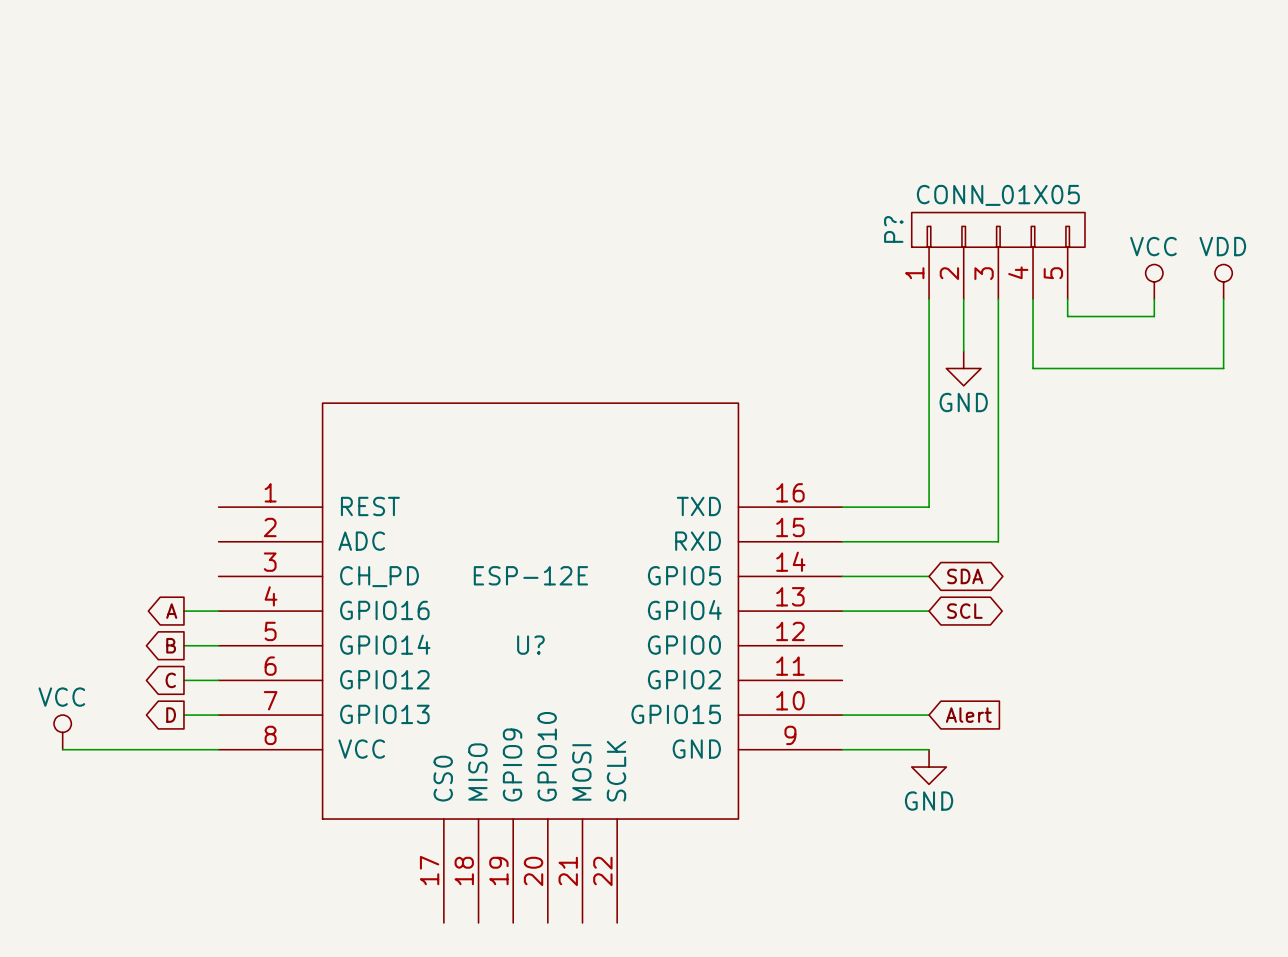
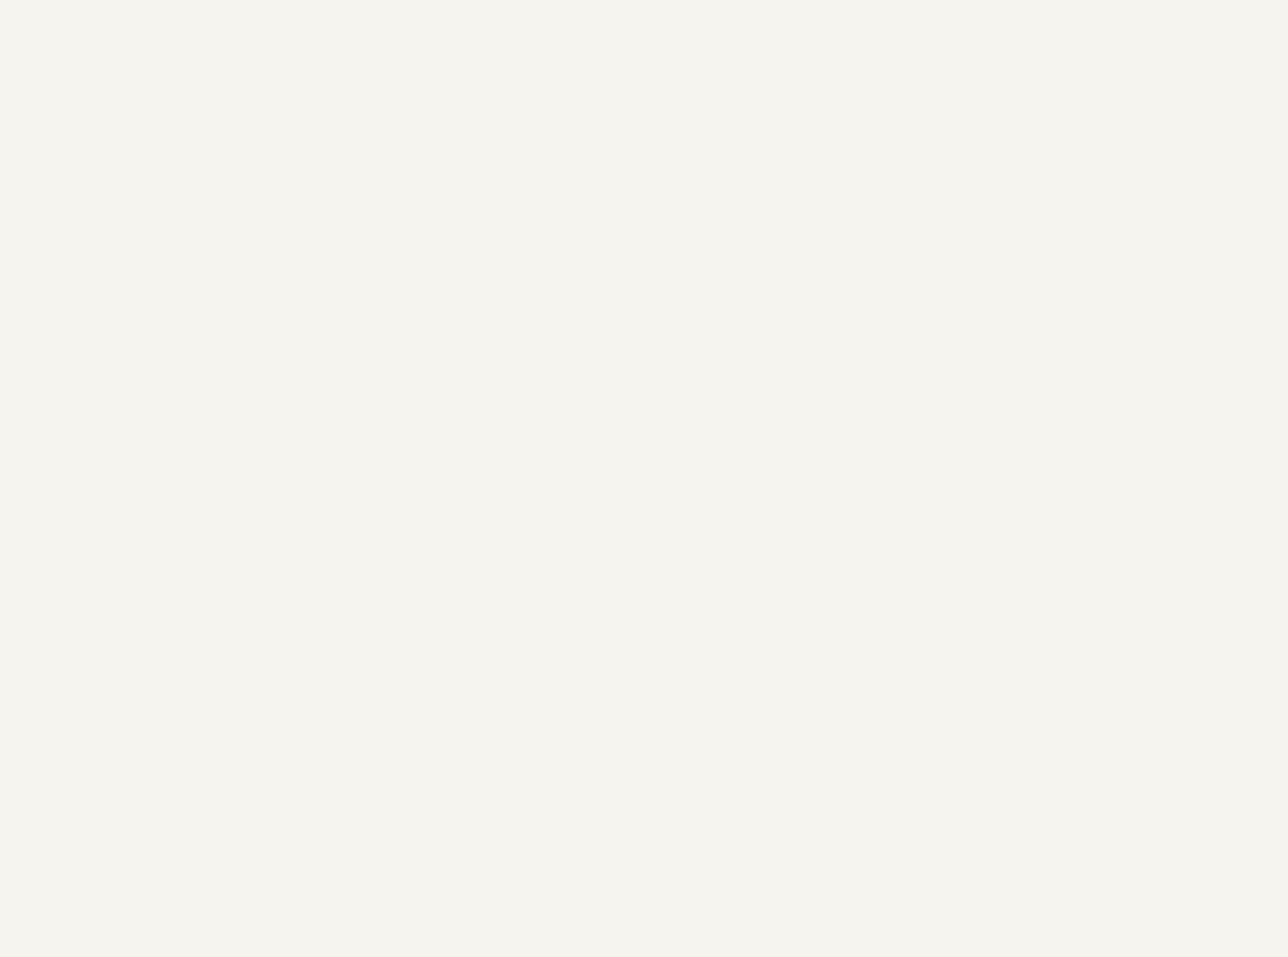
P?: CONN_01X05 (998, 255) -> none
power symbol: VCC (1154, 281) -> none
power symbol: VDD (1223, 281) -> none
wire: (929, 299) (929, 507) (842, 507) -> none
wire: (963, 299) (963, 351) -> none
wire: (998, 299) (998, 541) (842, 541) -> none
wire: (1033, 299) (1033, 368) (1223, 368) (1223, 299) -> none
wire: (1067, 299) (1067, 316) (1154, 316) (1154, 299) -> none
power symbol: GND (963, 368) -> none
wire: (842, 576) (929, 576) -> none
global label: SDA (965, 576) -> none
global label: A (171, 611) -> none
wire: (183, 611) (218, 611) -> none
wire: (842, 611) (929, 611) -> none
global label: SCL (964, 611) -> none
global label: B (171, 645) -> none
wire: (183, 645) (218, 645) -> none
U?: ESP-12E (530, 663) -> none
global label: C (170, 680) -> none
wire: (183, 680) (218, 680) -> none
global label: D (171, 715) -> none
wire: (183, 715) (218, 715) -> none
wire: (842, 715) (929, 715) -> none
global label: Alert (968, 715) -> none
power symbol: VCC (62, 732) -> none
wire: (62, 749) (218, 749) -> none
wire: (842, 749) (929, 749) -> none
power symbol: GND (929, 767) -> none

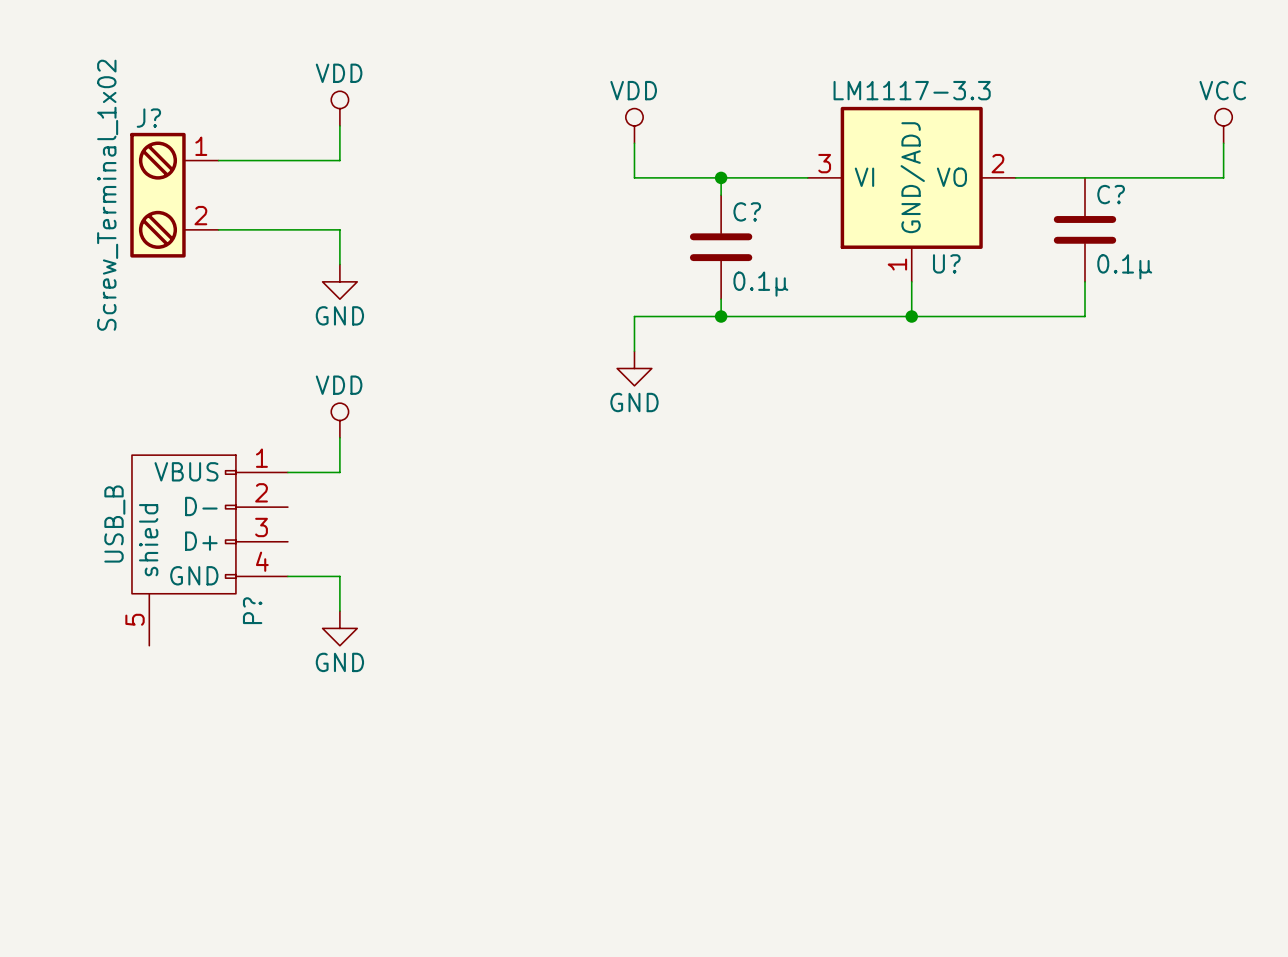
power symbol: none -> VDD (339, 108)
wire: none -> (339, 125) (339, 160) (218, 160)
power symbol: none -> VDD (634, 125)
power symbol: none -> VCC (1223, 125)
wire: none -> (634, 143) (634, 177) (807, 177)
wire: none -> (1223, 143) (1223, 177) (1015, 177)
wire: none -> (721, 177) (721, 195)
junction: none -> (721, 177)
U?: none -> LM1117-3.3 (911, 194)
J?: none -> Screw_Terminal_1x02 (174, 195)
wire: none -> (218, 229) (339, 229) (339, 264)
C?: none -> 0.1µ (1084, 229)
C?: none -> 0.1µ (721, 247)
power symbol: none -> GND (339, 281)
wire: none -> (911, 281) (911, 316)
wire: none -> (1084, 281) (1084, 316) (634, 316) (634, 351)
wire: none -> (721, 299) (721, 316)
junction: none -> (721, 316)
junction: none -> (911, 316)
power symbol: none -> GND (634, 368)
power symbol: none -> VDD (339, 420)
wire: none -> (339, 437) (339, 472) (287, 472)
P?: none -> USB_B (209, 550)
wire: none -> (287, 576) (339, 576) (339, 611)
power symbol: none -> GND (339, 628)

